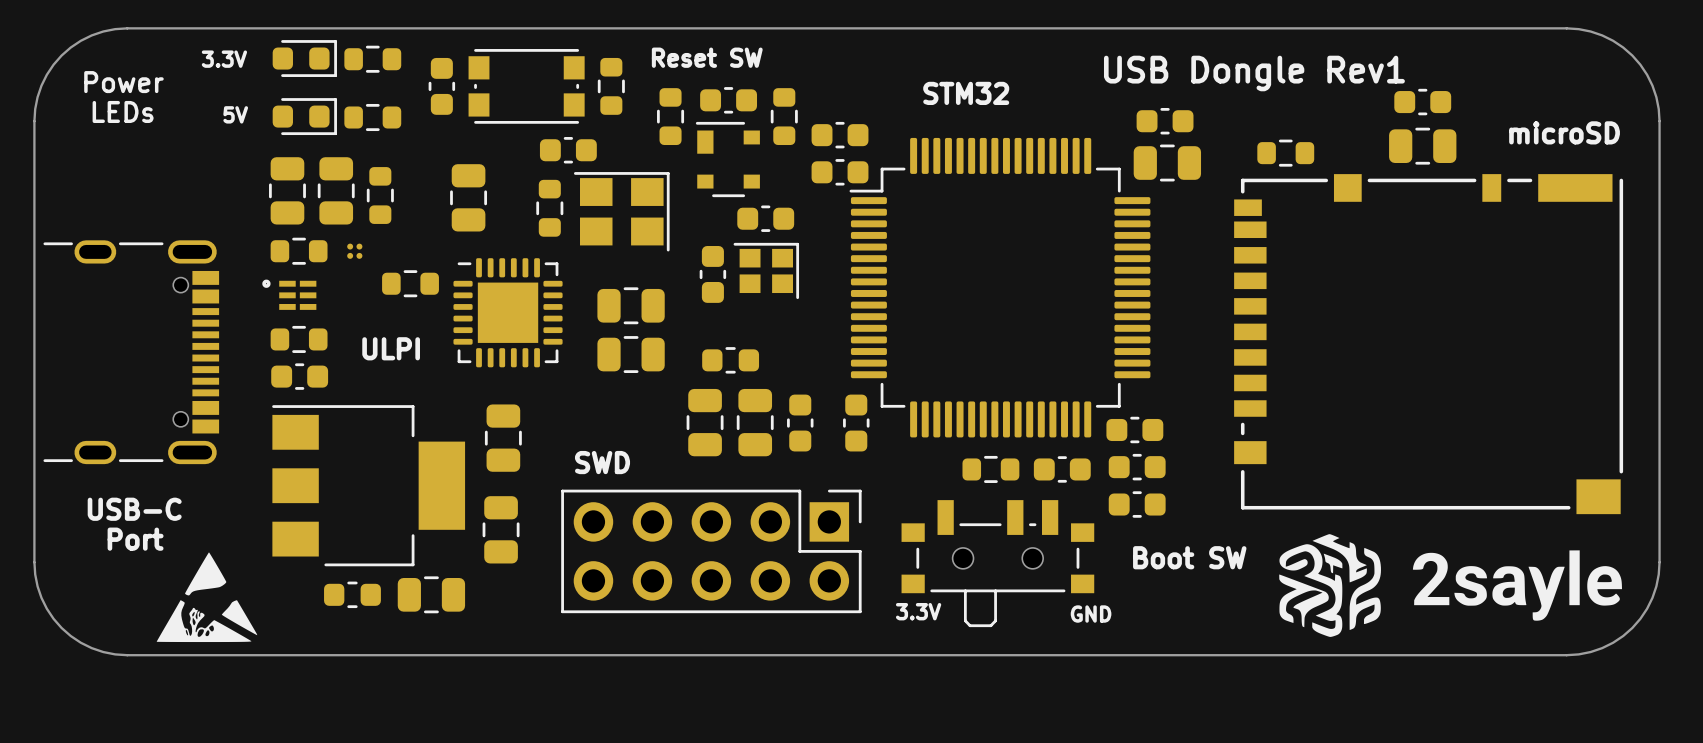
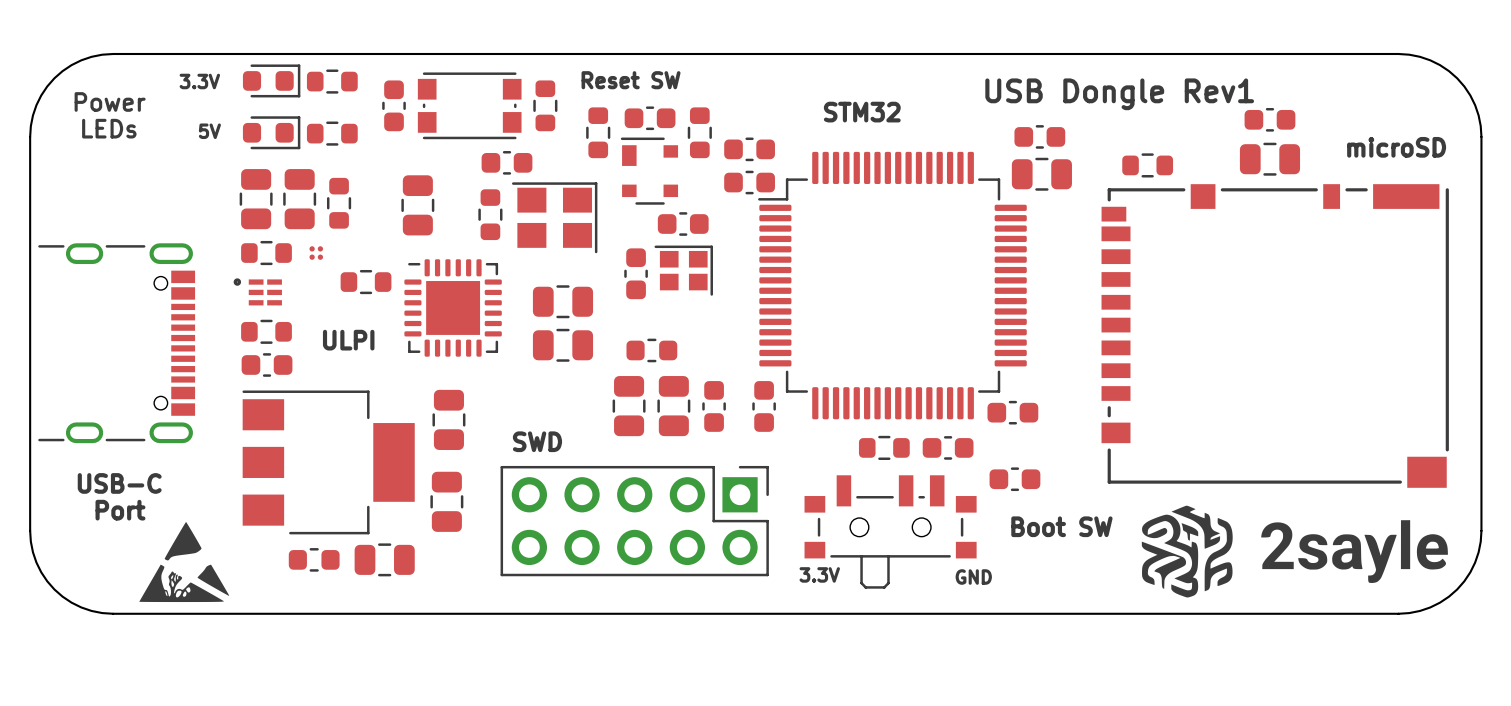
part: (1137, 467) -> none

